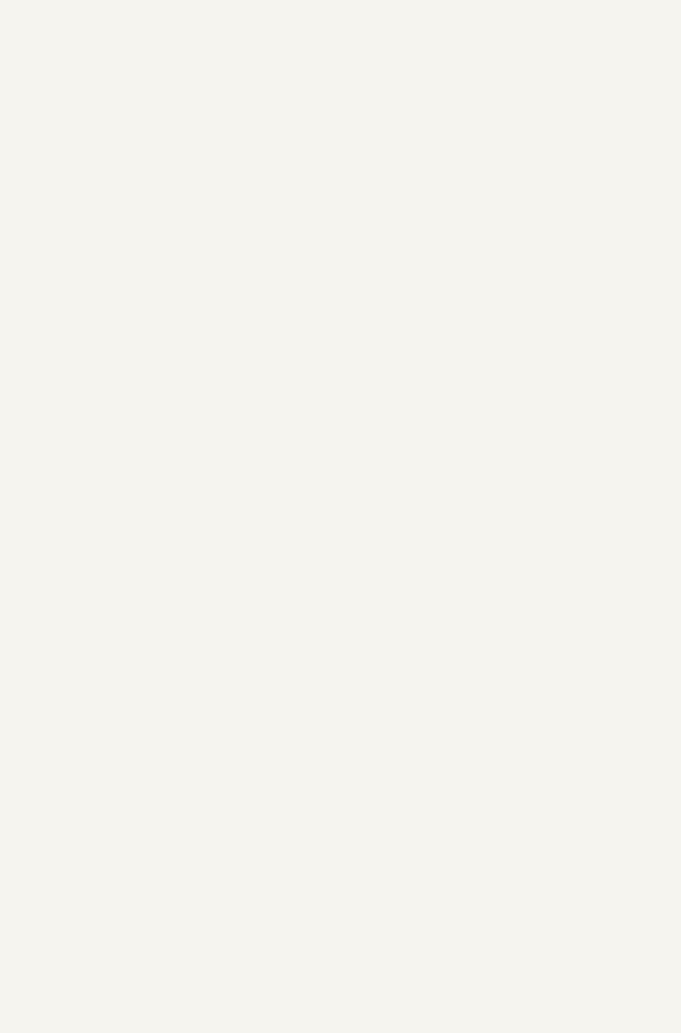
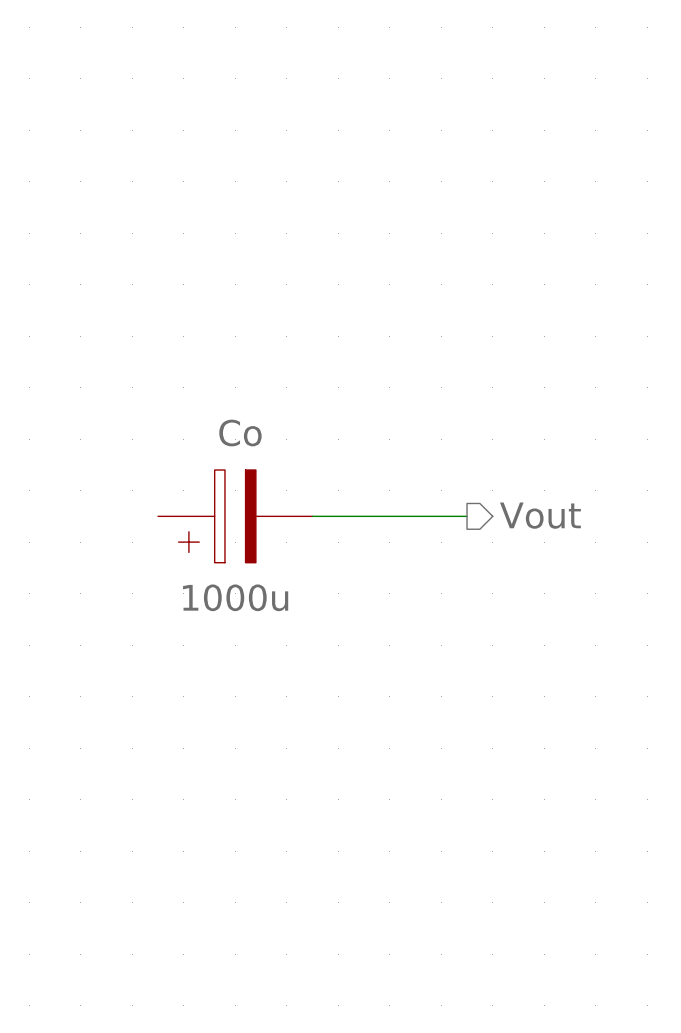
hierarchical label: none -> Vout (540, 515)
Co: none -> 1000u (235, 516)
wire: none -> (312, 516) (467, 516)

